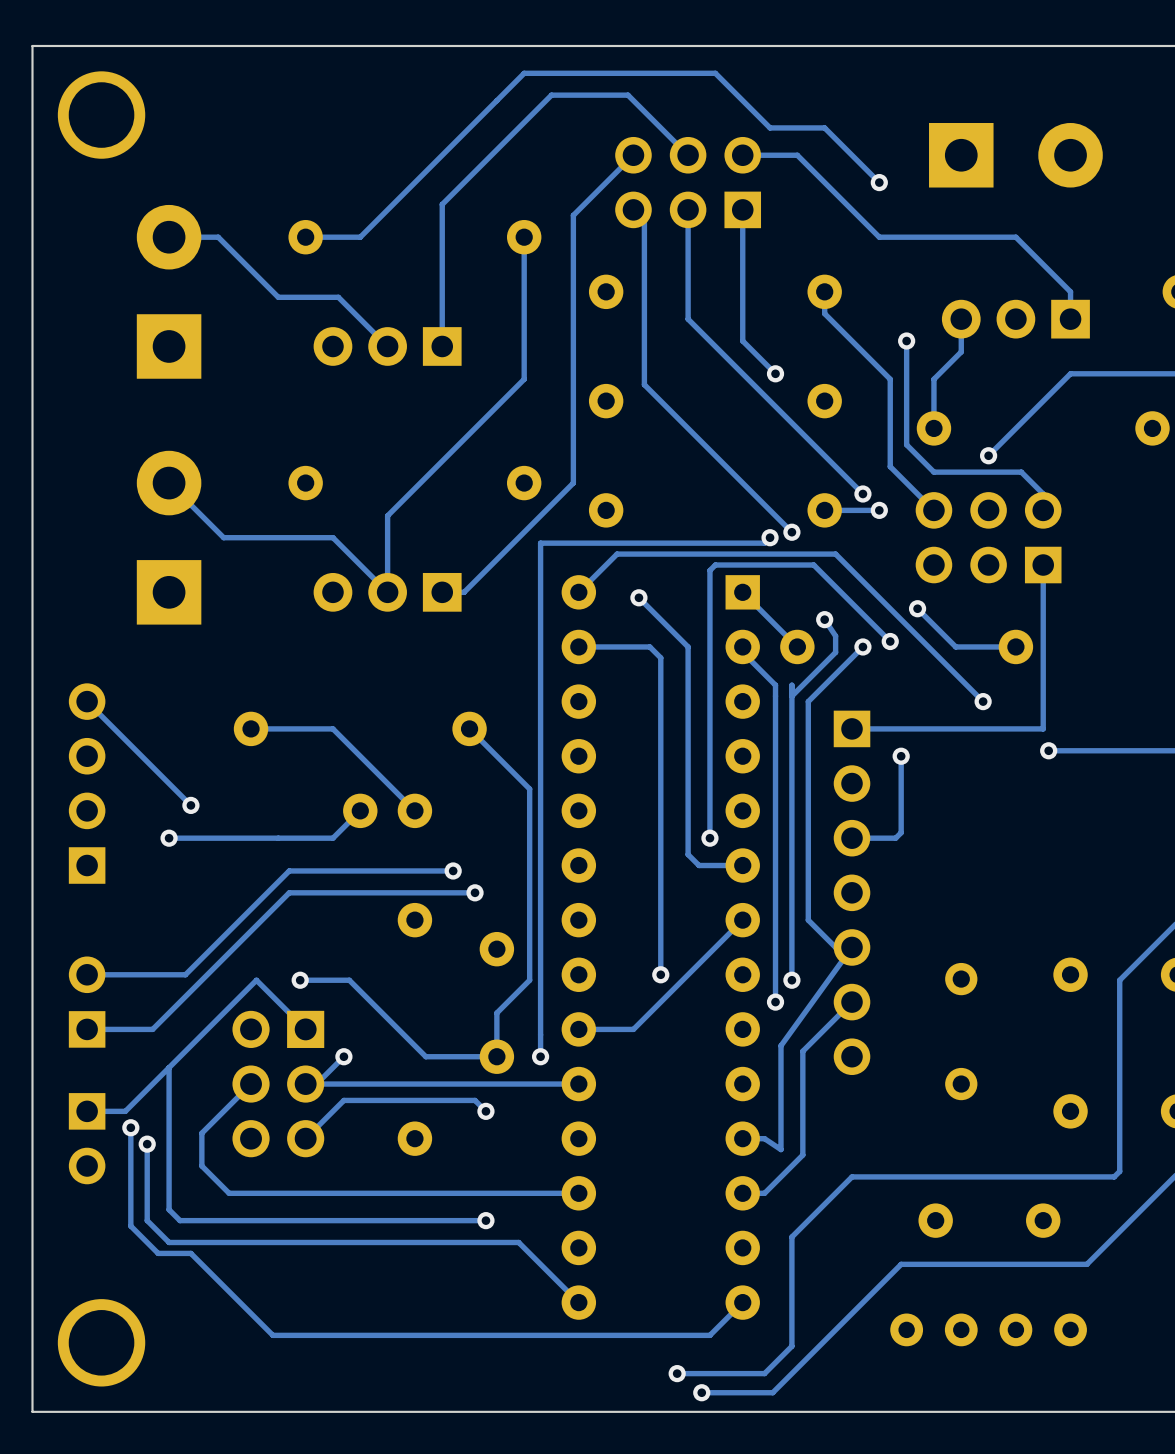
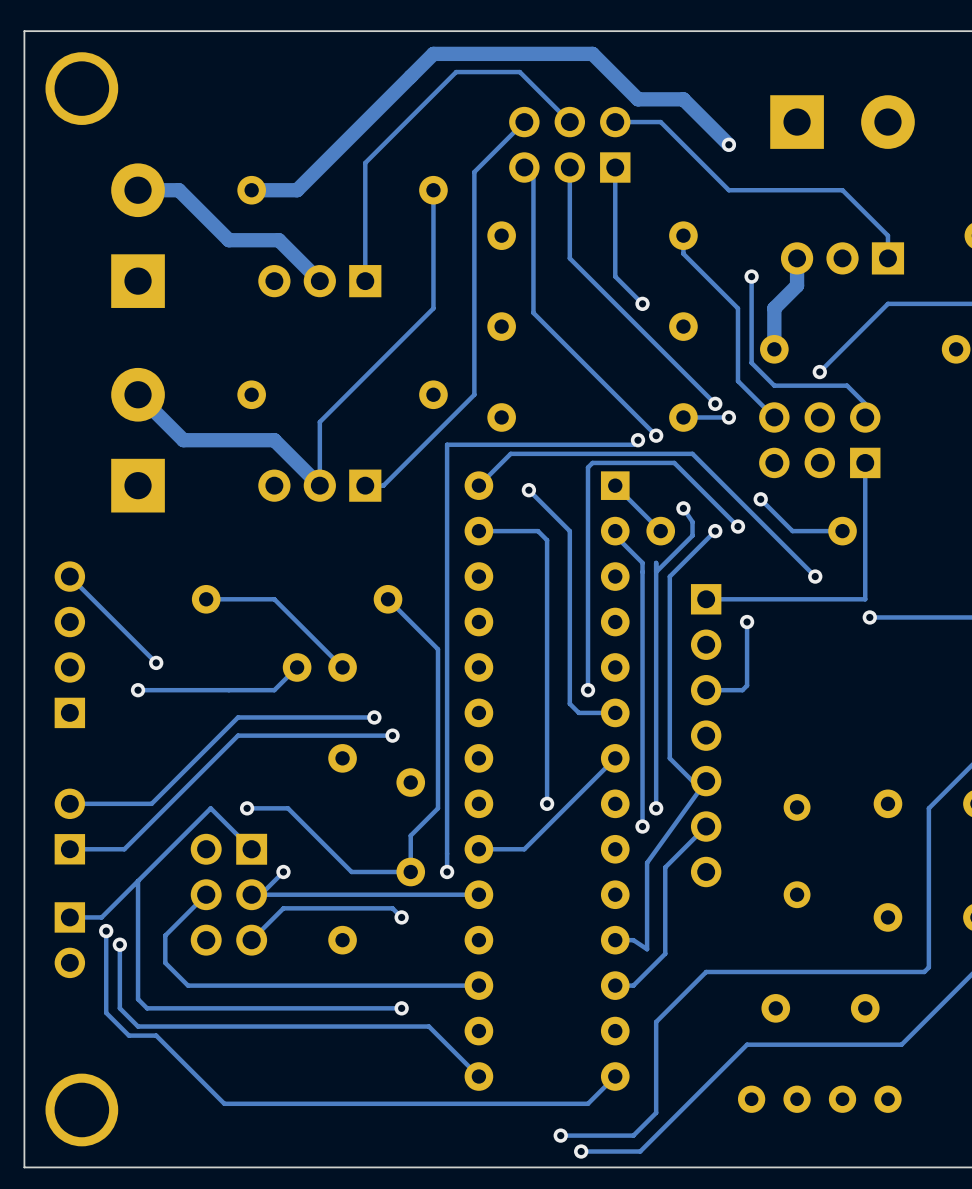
track width: thin (879, 182) (824, 127) (770, 127) (715, 73) (524, 73) (360, 237) (305, 237) -> thick (728, 144) (683, 99) (637, 99) (592, 53) (433, 53) (297, 190) (251, 190)
track width: thin (169, 237) (218, 237) (278, 297) (338, 297) (387, 346) -> thick (138, 190) (178, 190) (228, 240) (278, 240) (319, 281)
track width: thin (961, 319) (961, 351) (933, 379) (933, 428) -> thick (797, 258) (797, 285) (774, 308) (774, 349)
track width: thin (169, 483) (223, 537) (332, 537) (387, 592) -> thick (138, 394) (183, 440) (274, 440) (319, 485)

